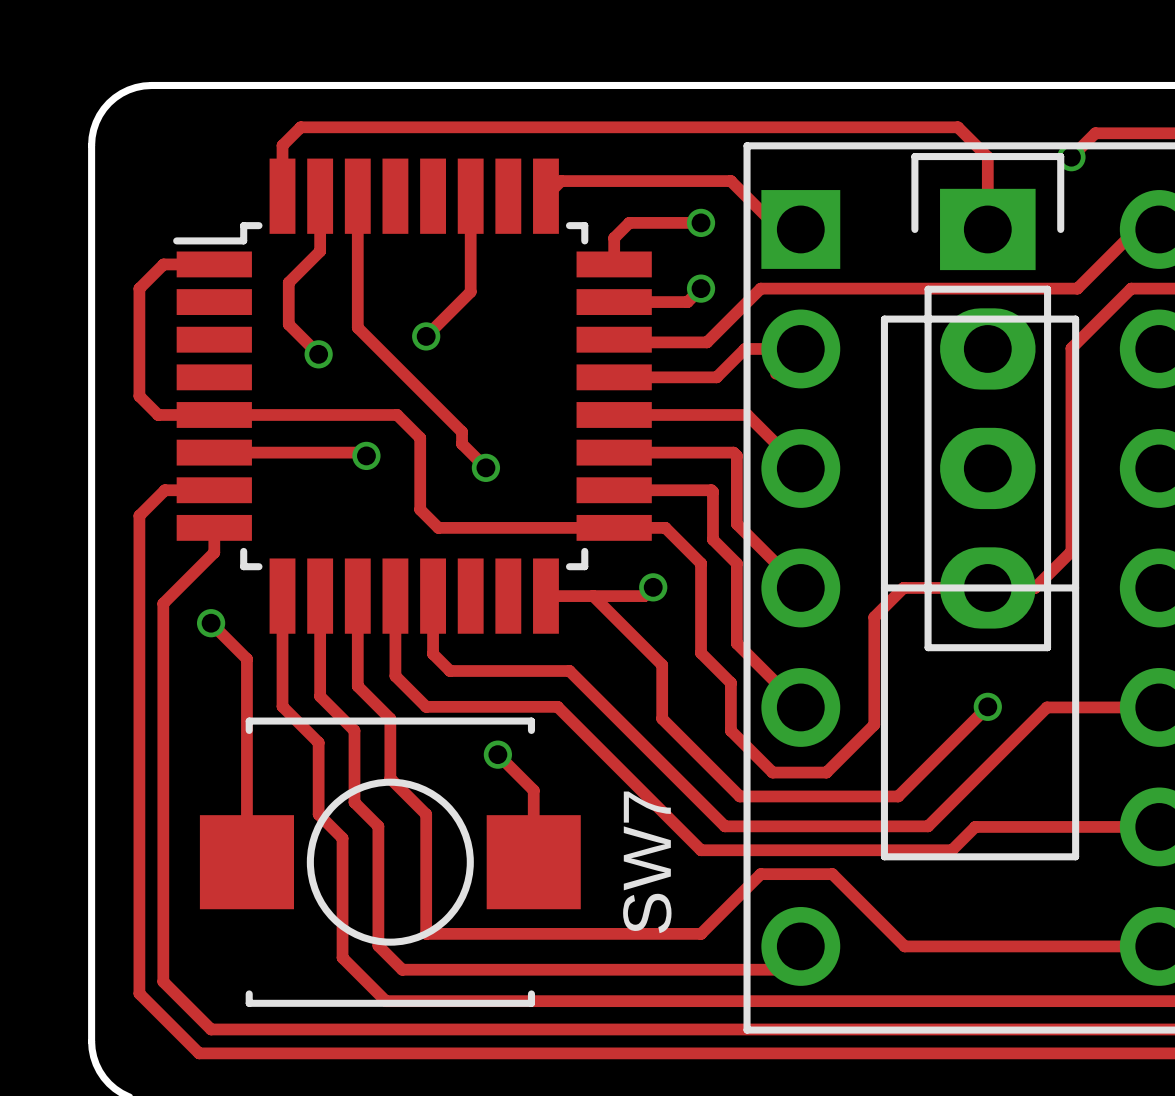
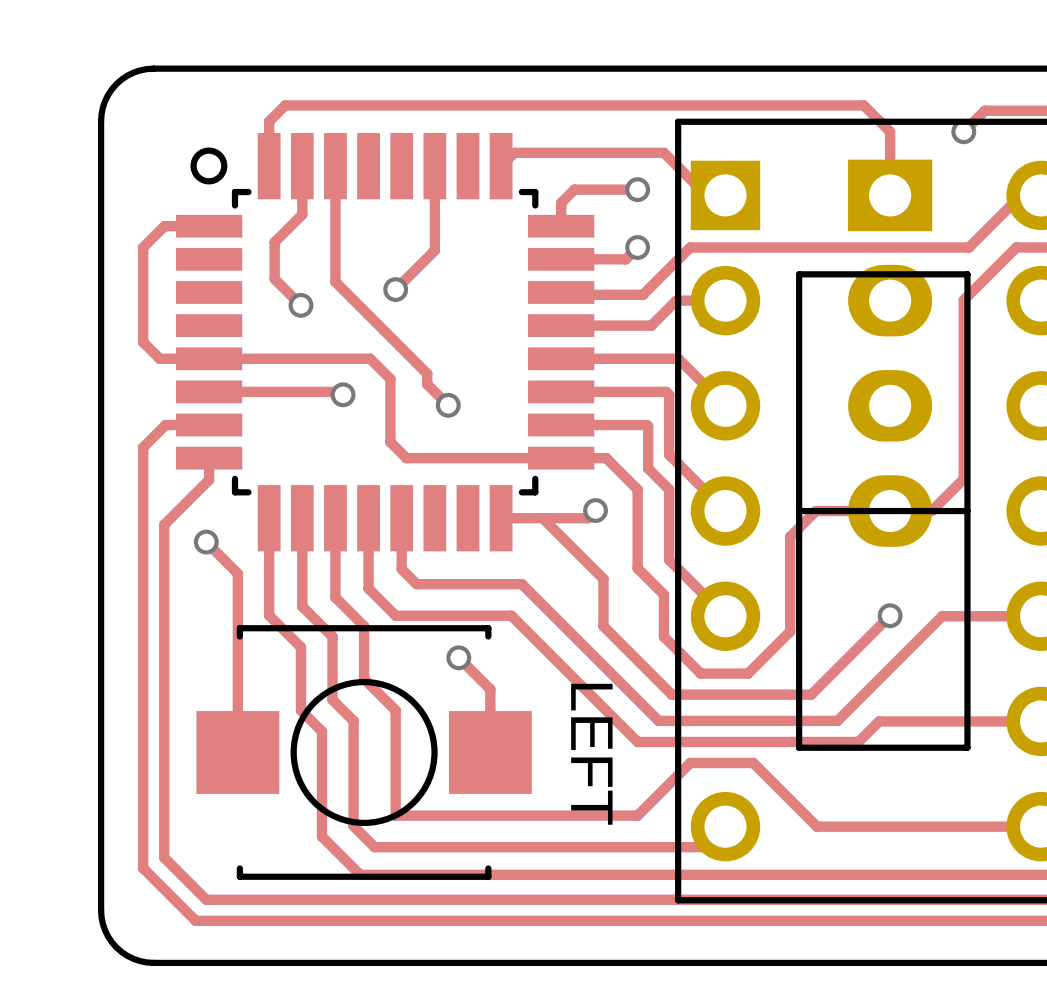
part footprint: [911, 153, 1065, 652] -> [848, 159, 933, 547]
part footprint: [173, 158, 652, 634] -> [175, 133, 595, 552]
SW7 name: SW7 (647, 862) -> none
text: none -> LEFT (591, 754)

